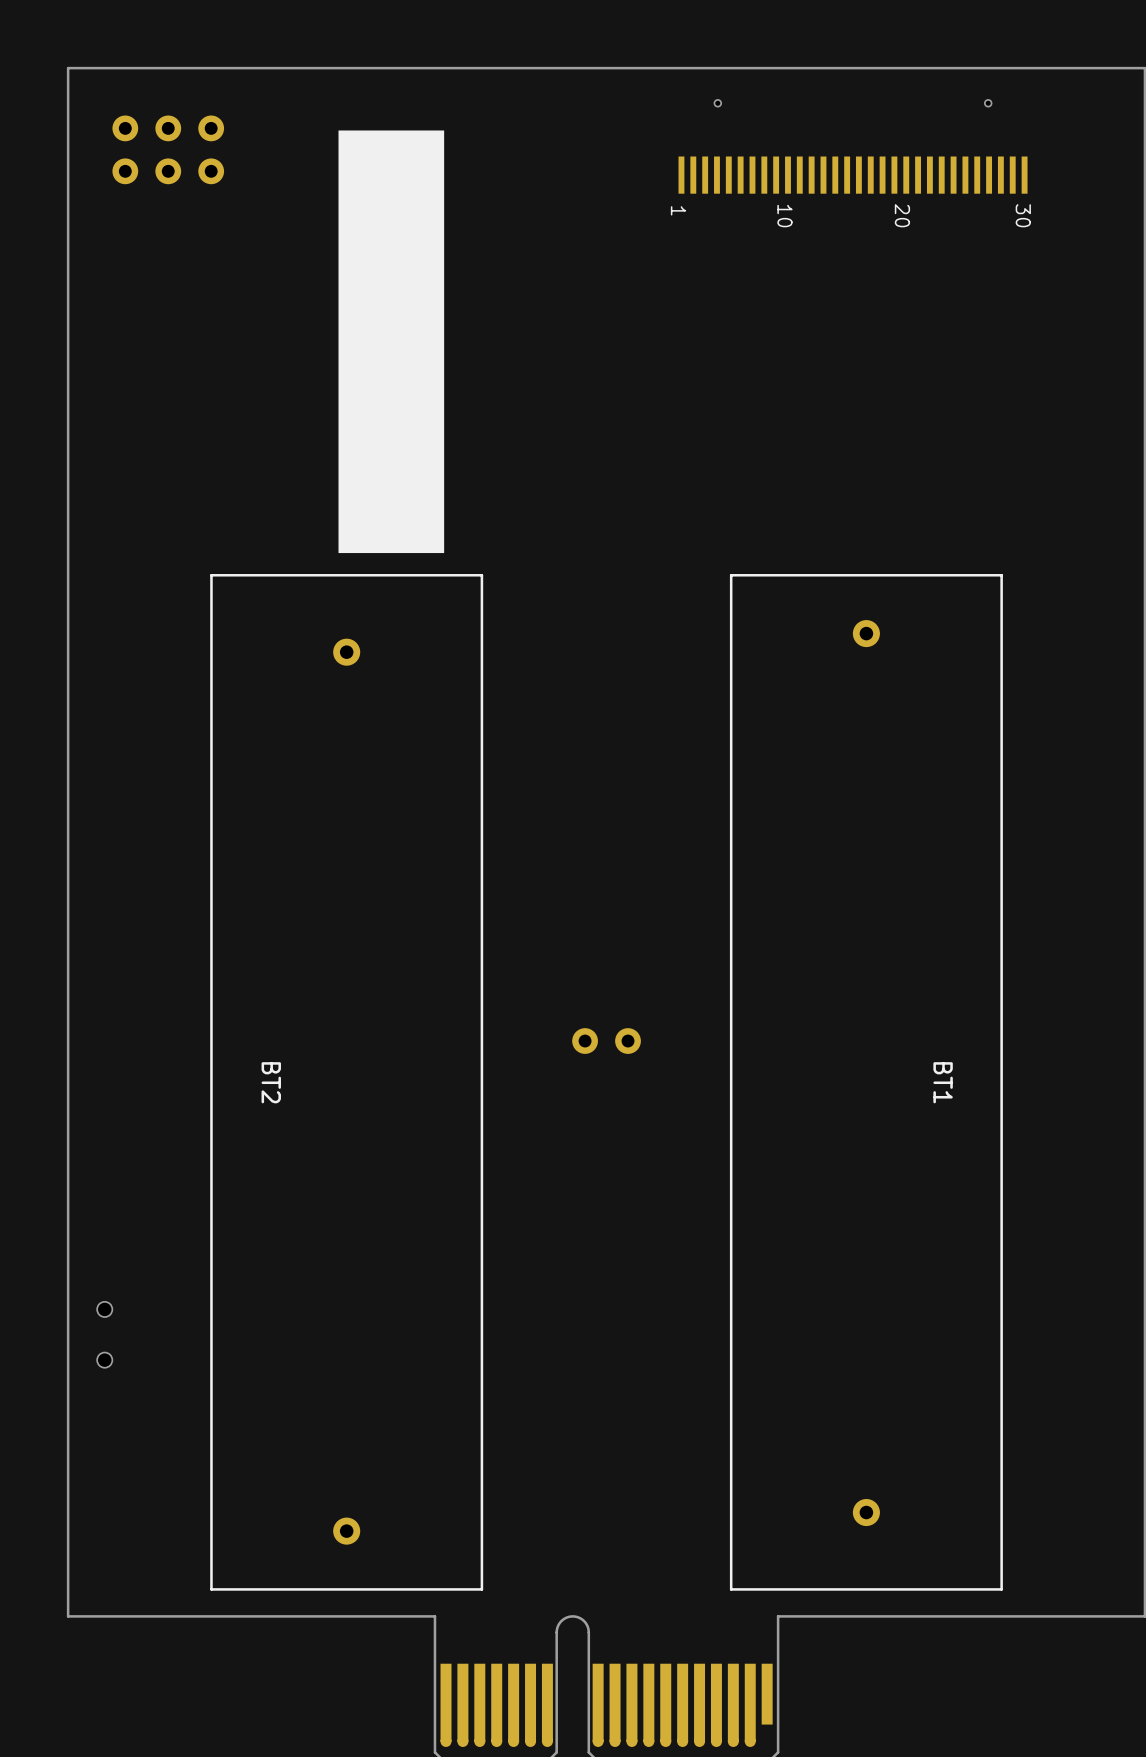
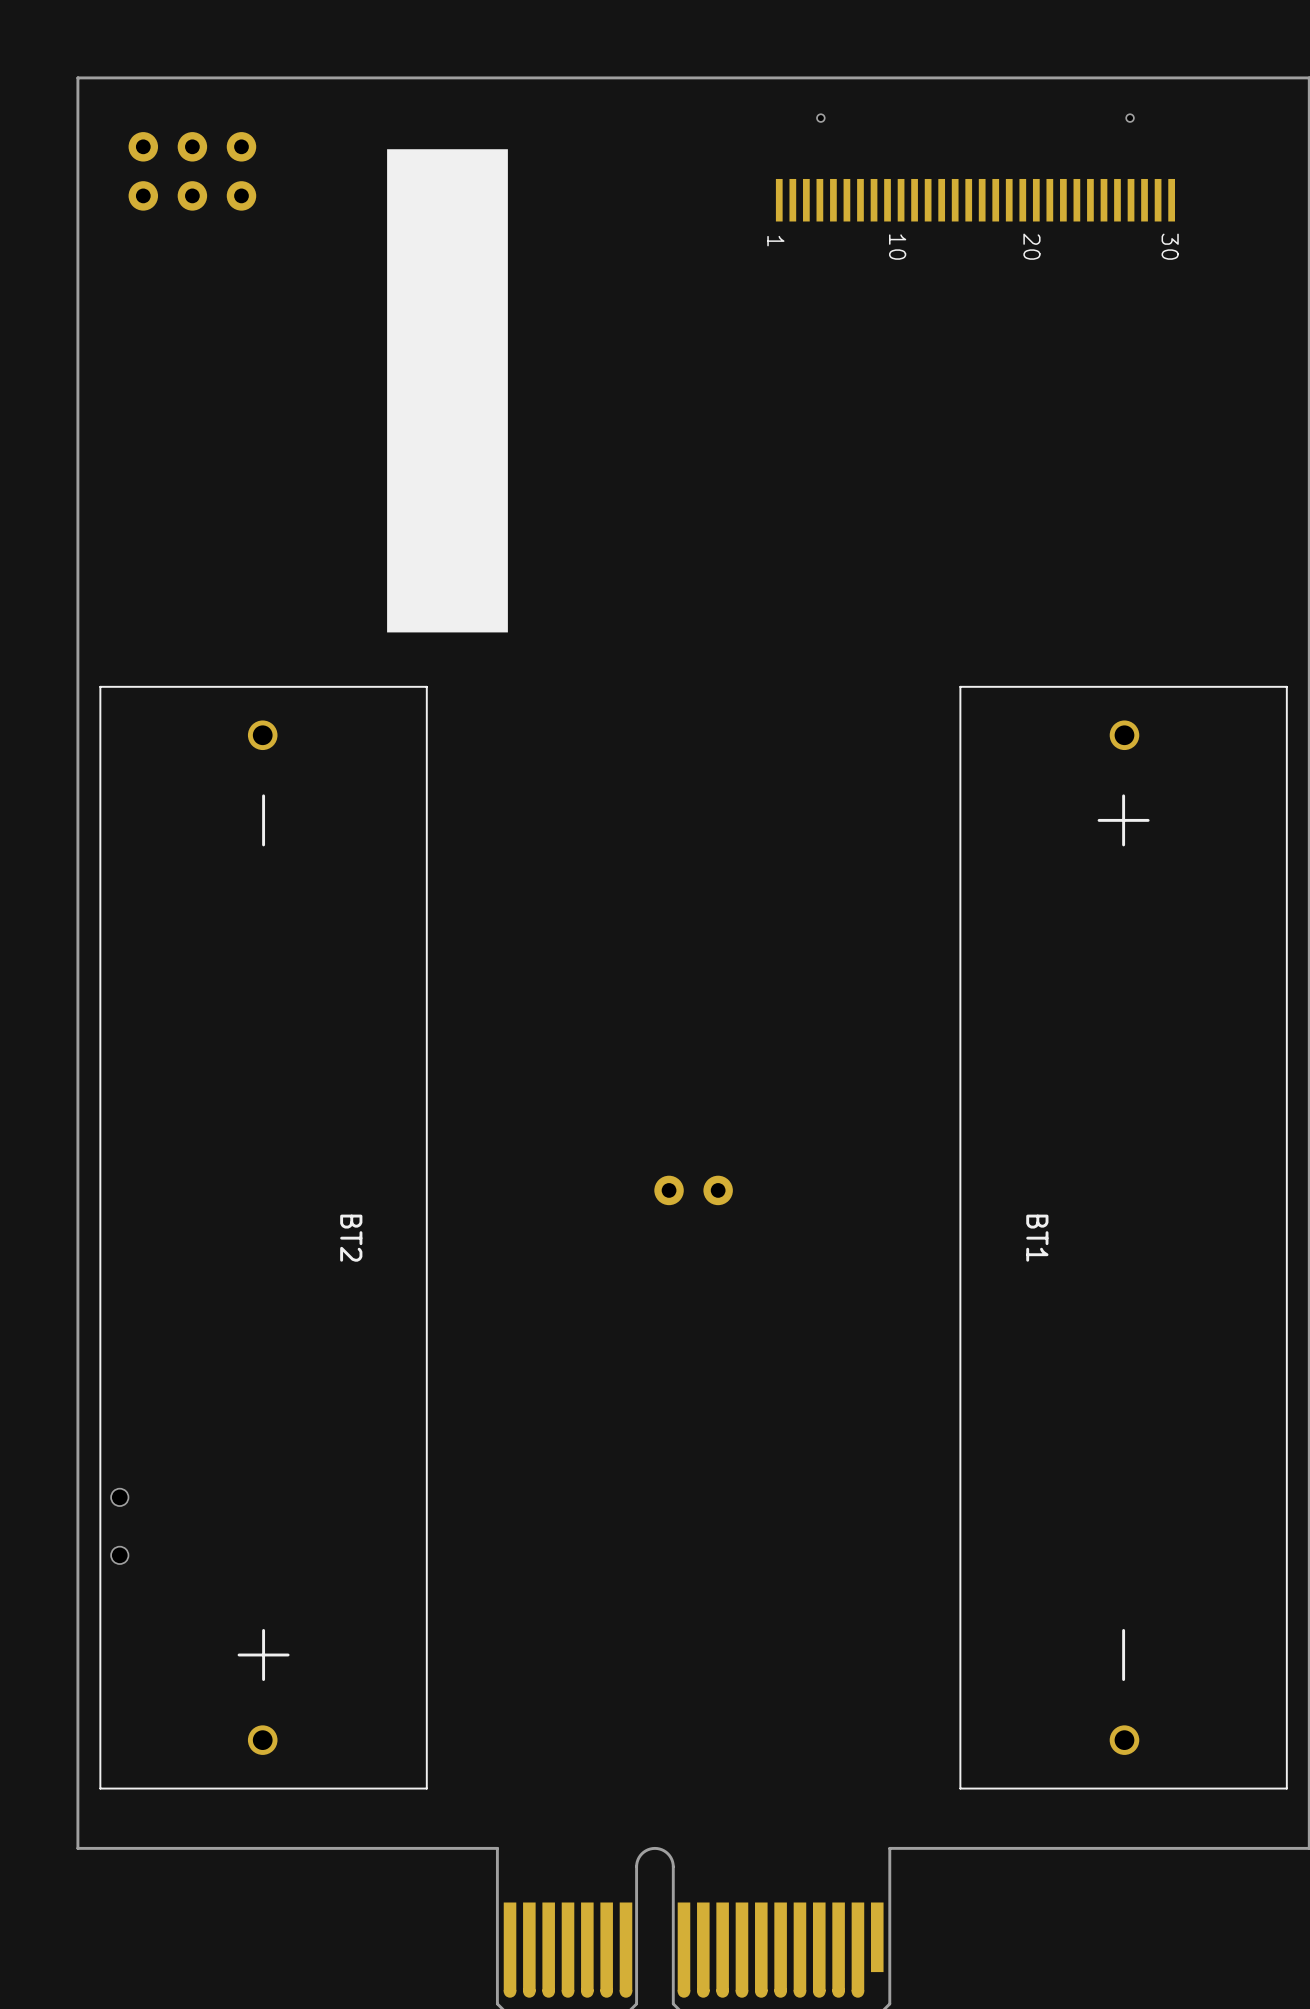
BT2 footprint: [210, 574, 484, 1591] -> [99, 685, 428, 1790]
BT1 footprint: [729, 574, 1003, 1591] -> [959, 685, 1288, 1790]
BT2 name position: BT2 (271, 1082) -> BT2 (351, 1238)
BT1 name position: BT1 (943, 1082) -> BT1 (1037, 1238)

